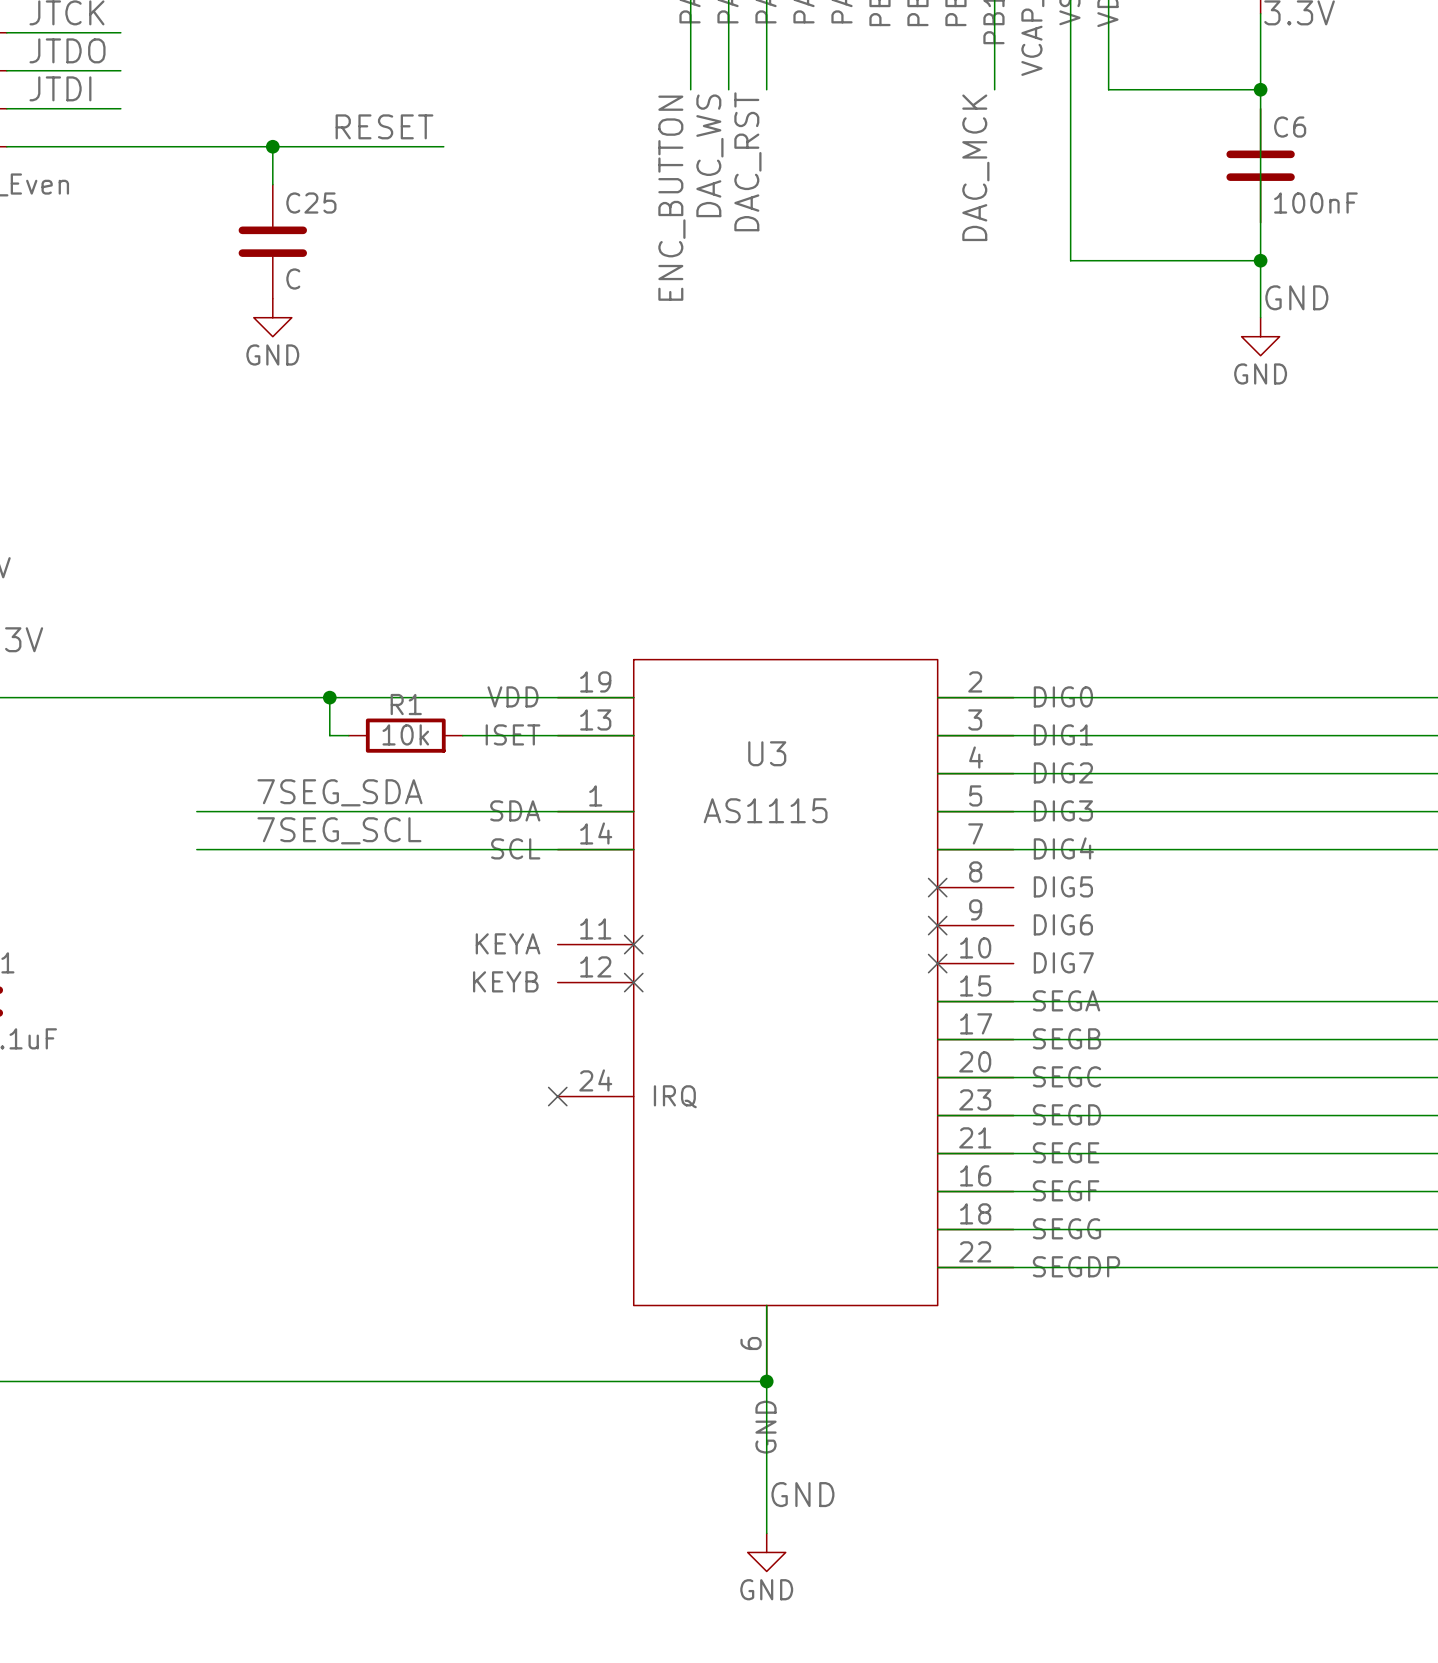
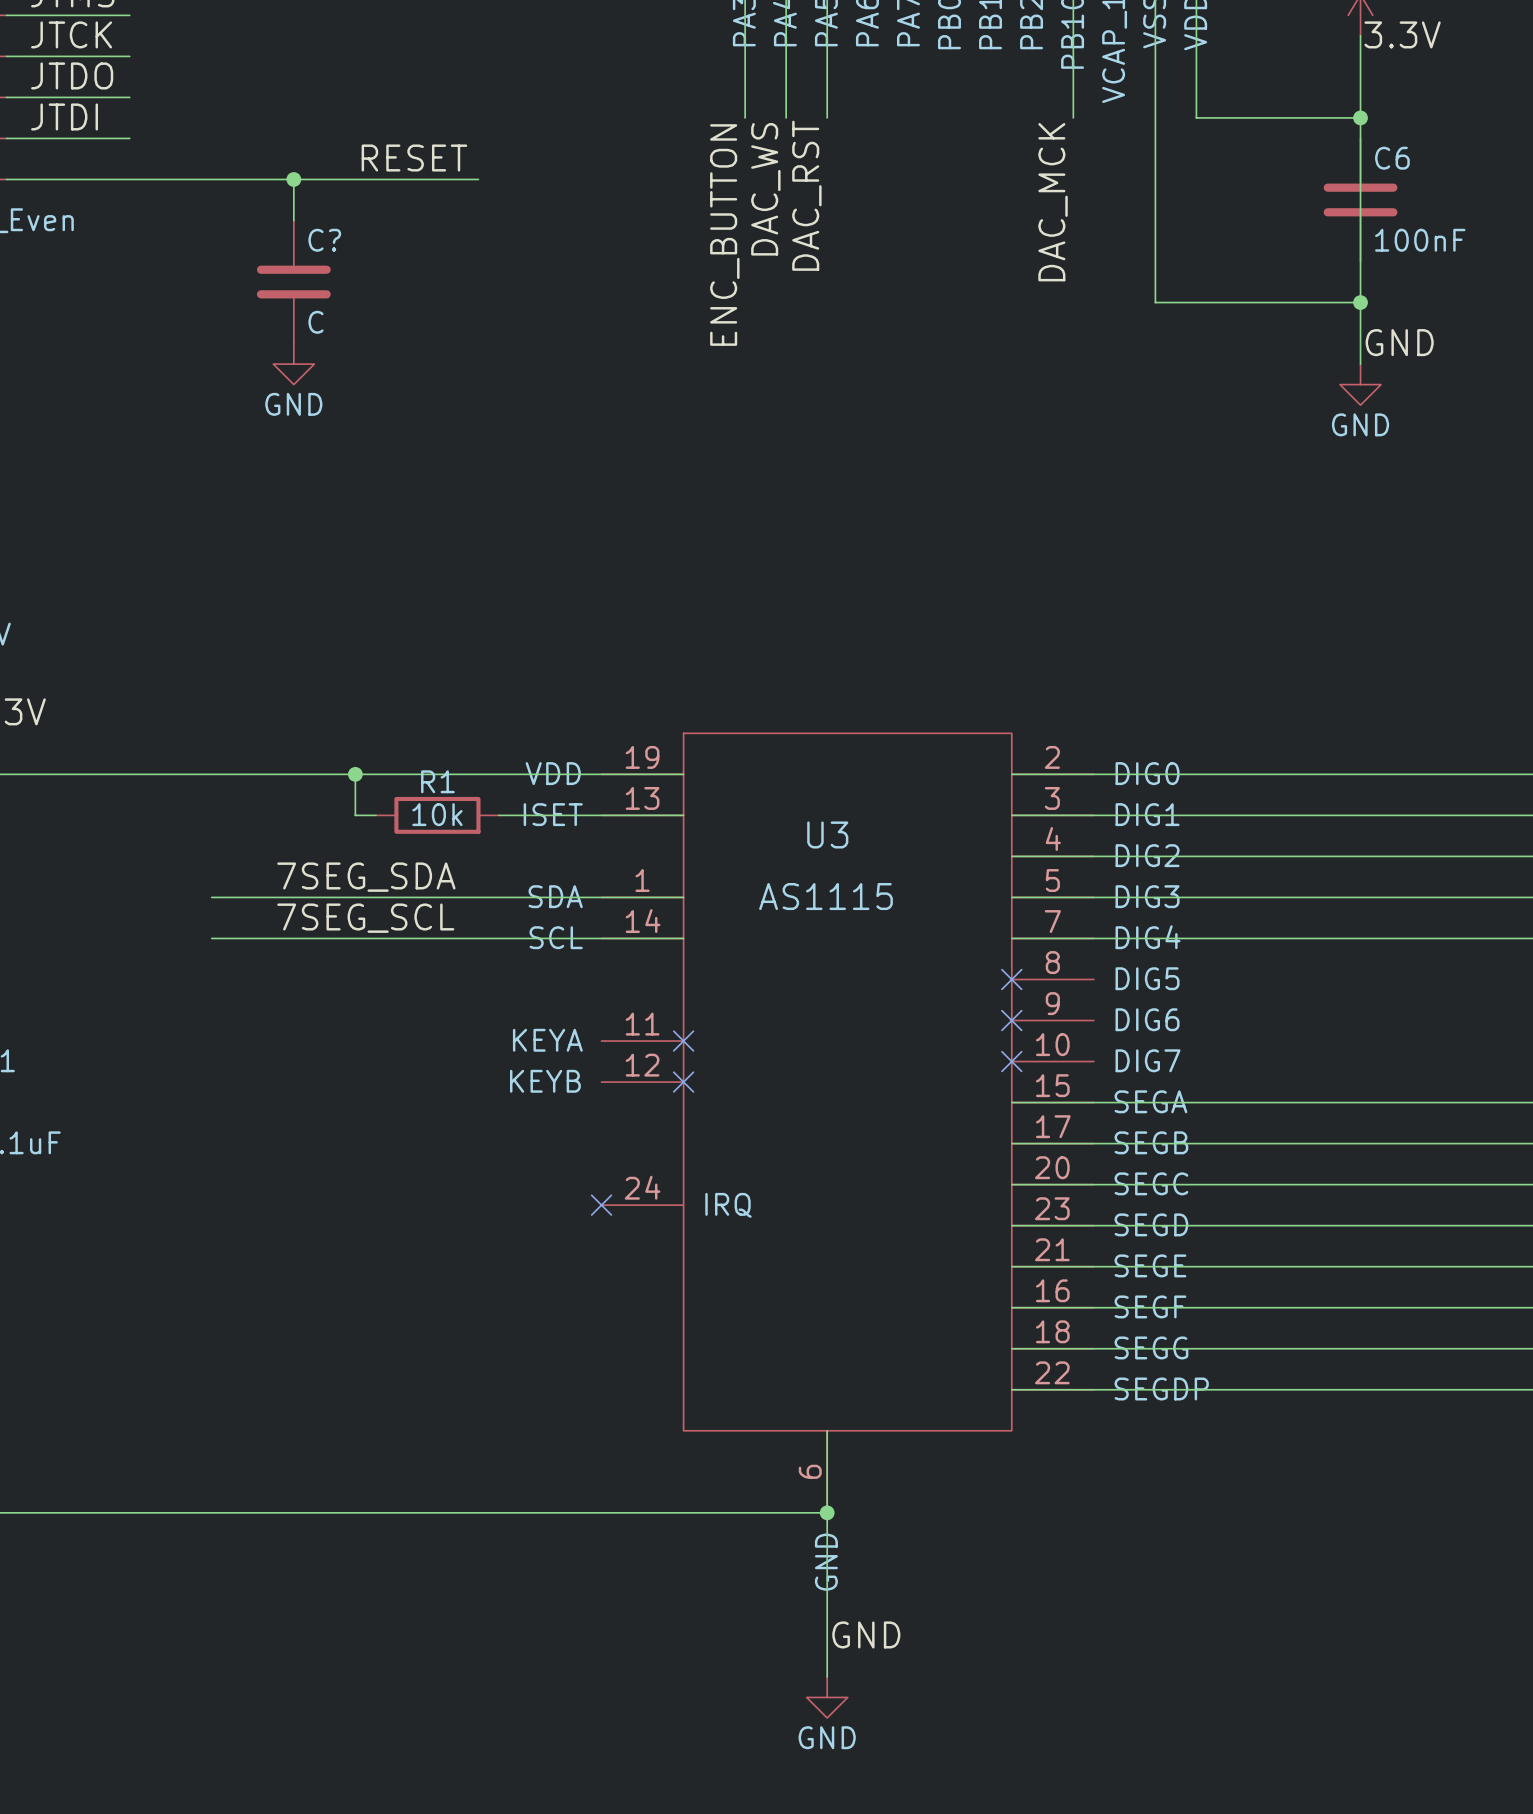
C25 name: C25 (311, 203) -> C? (324, 240)

